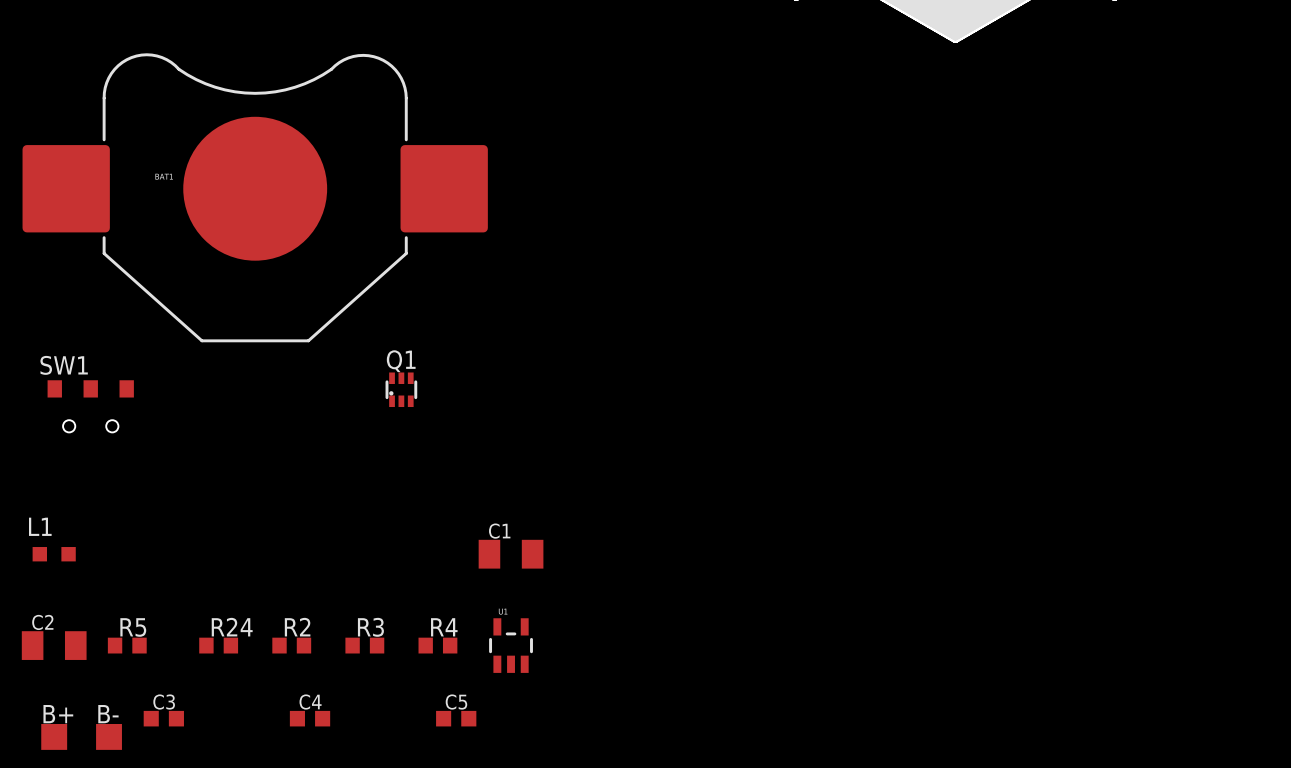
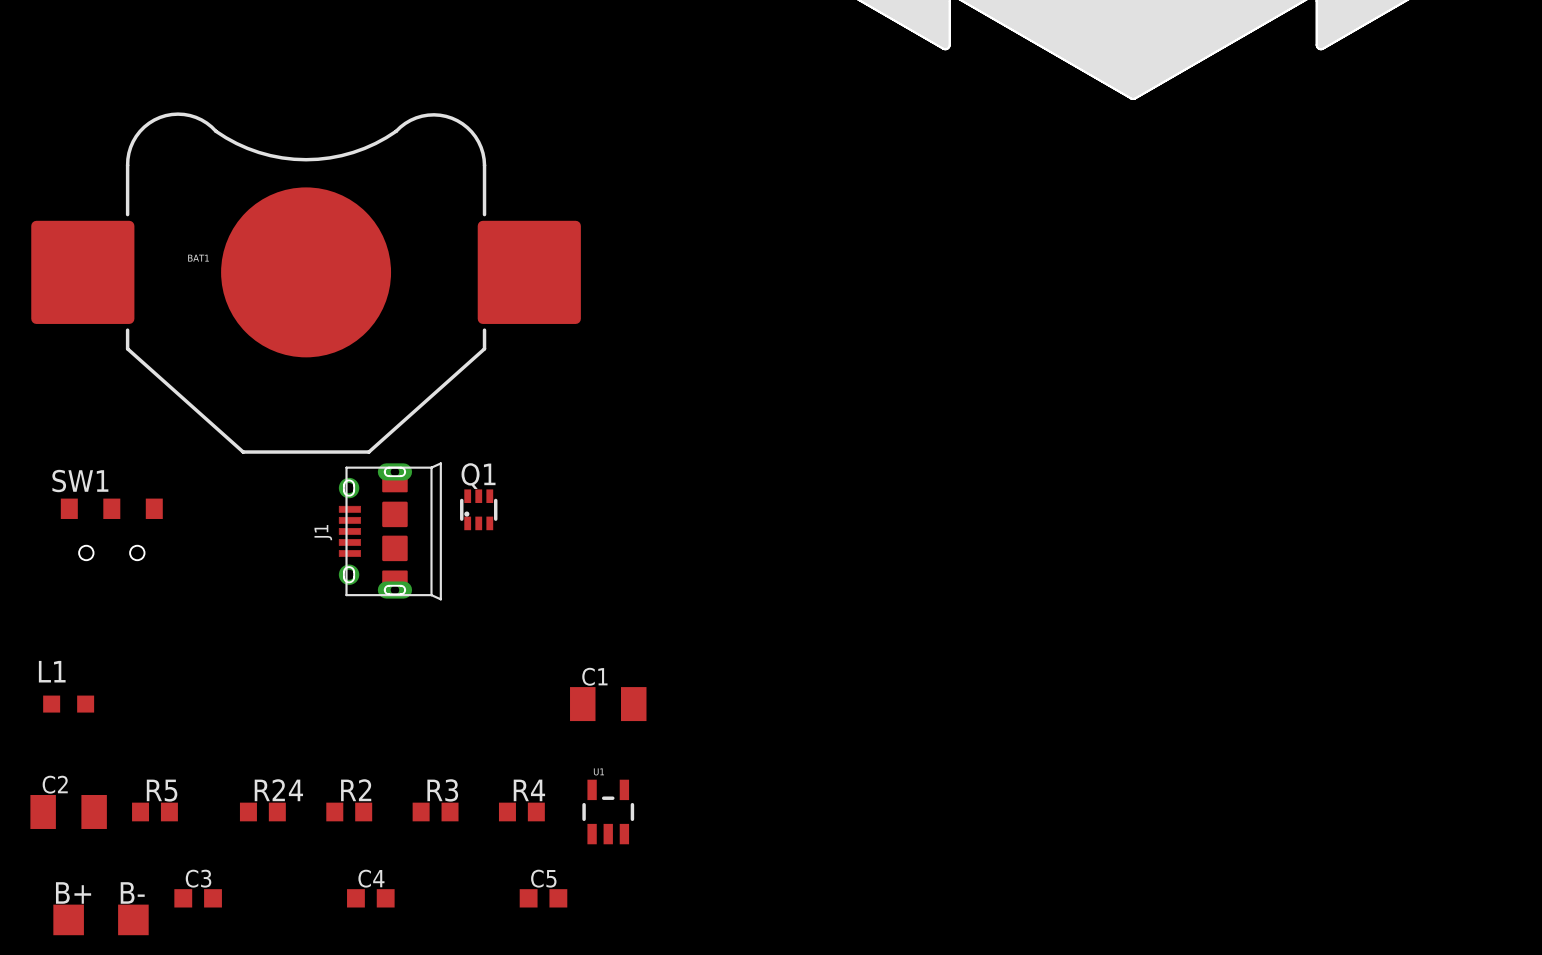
J1: none -> (390, 531)

